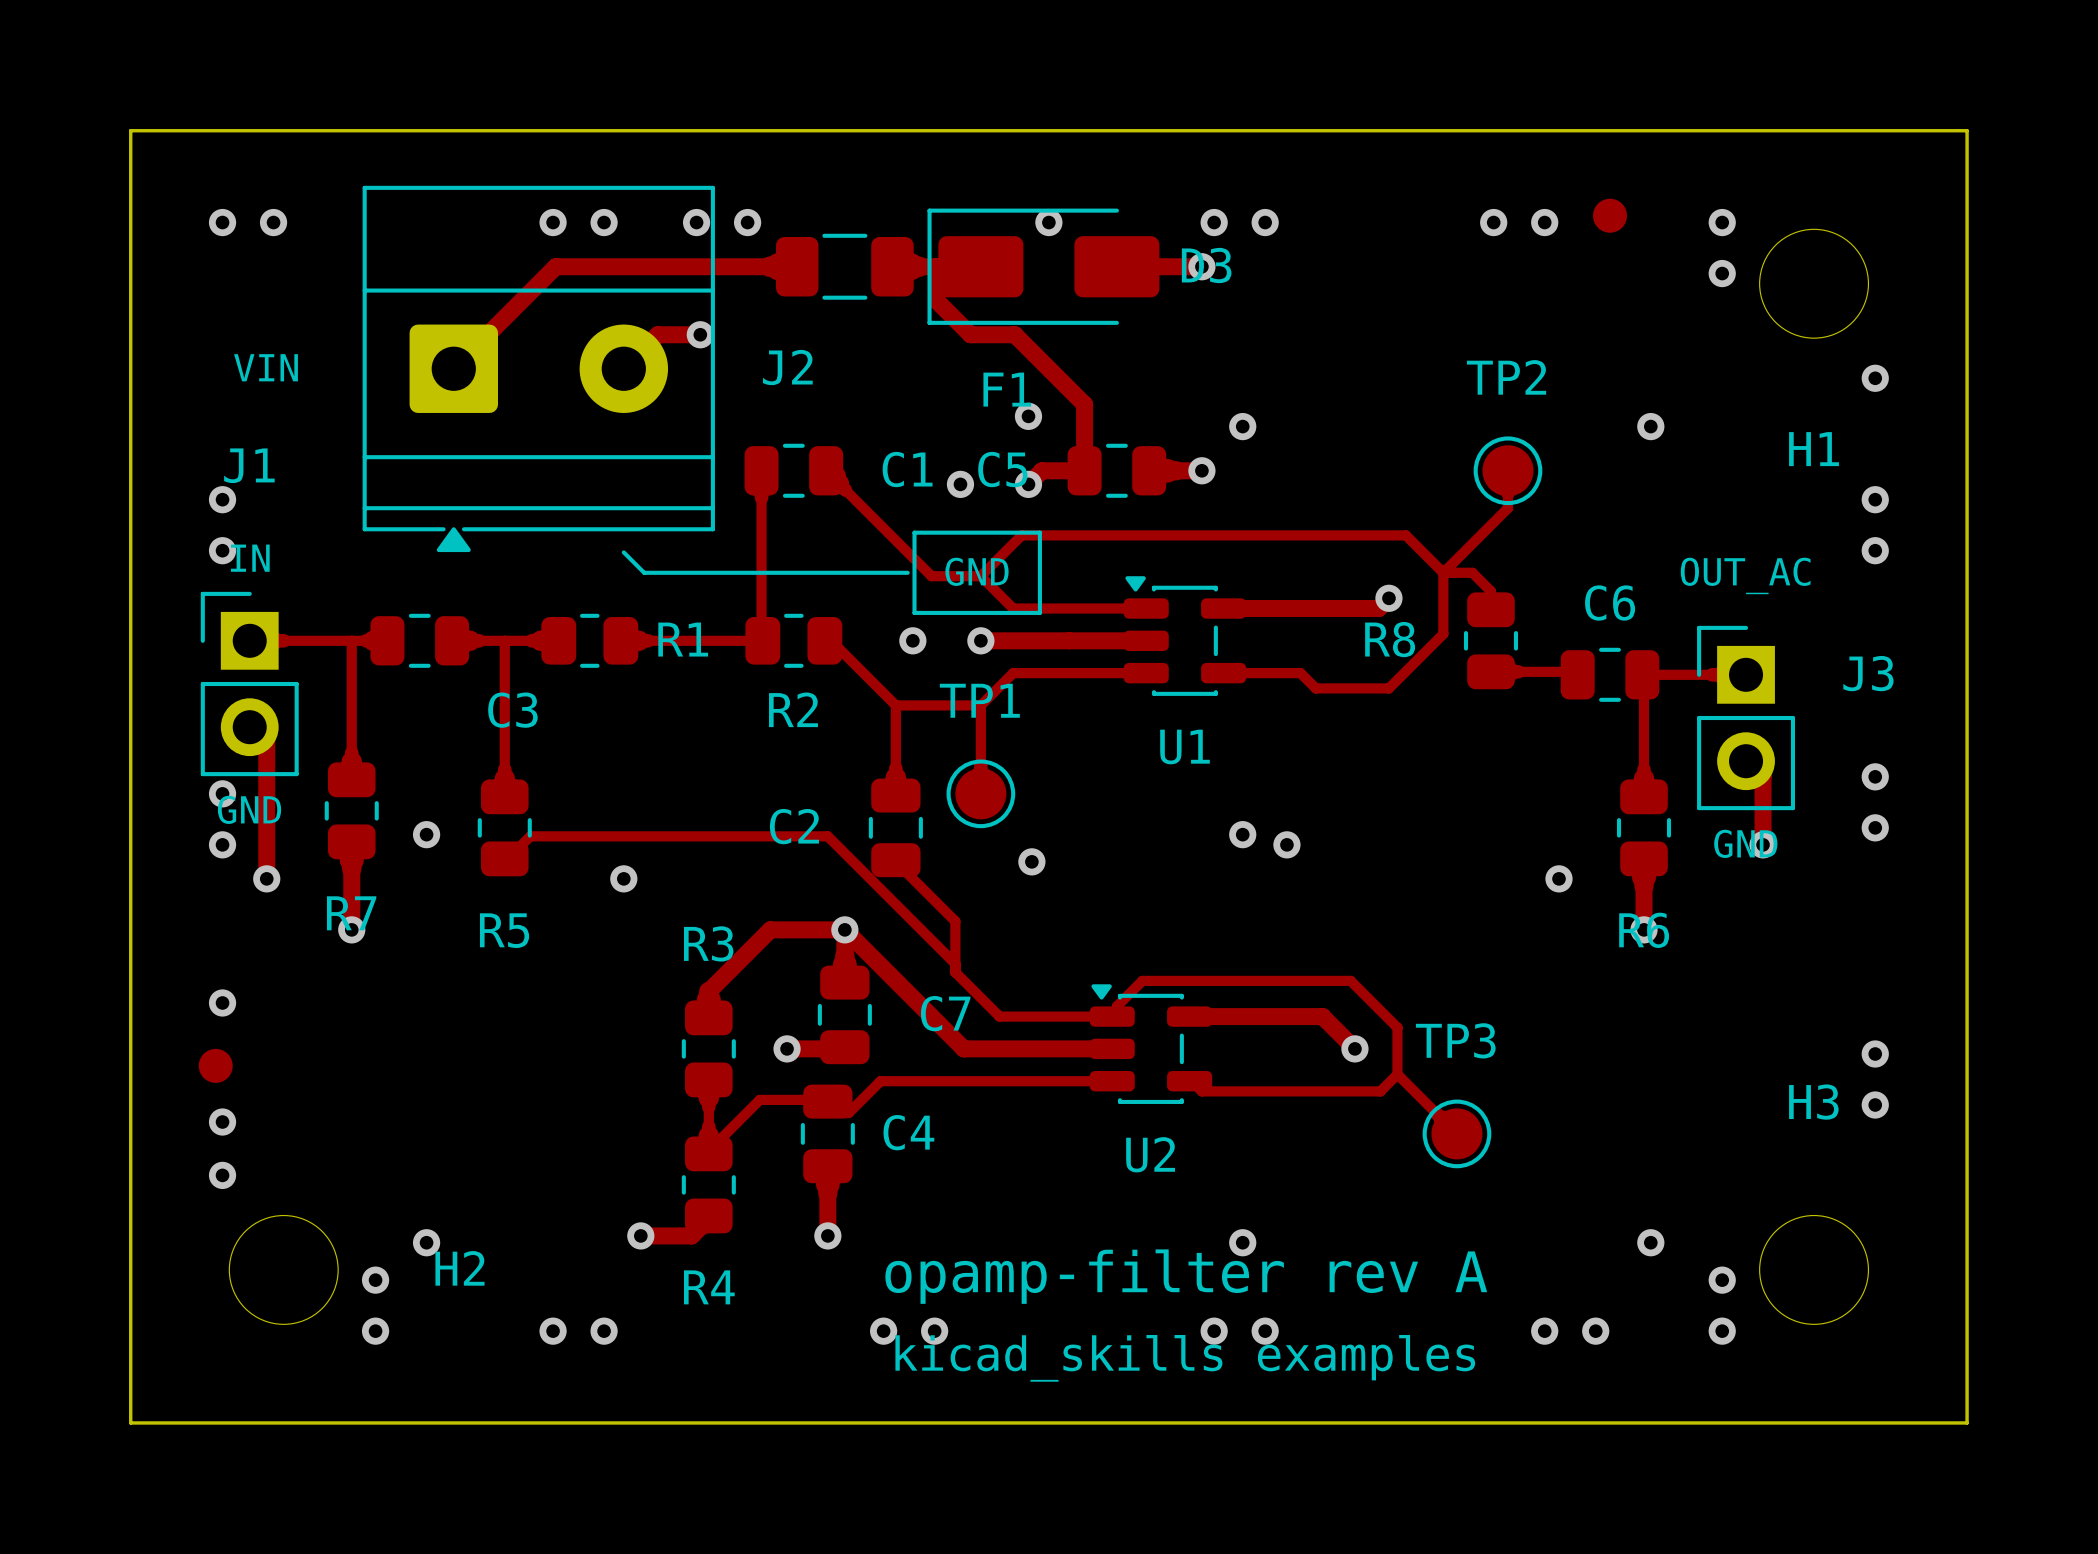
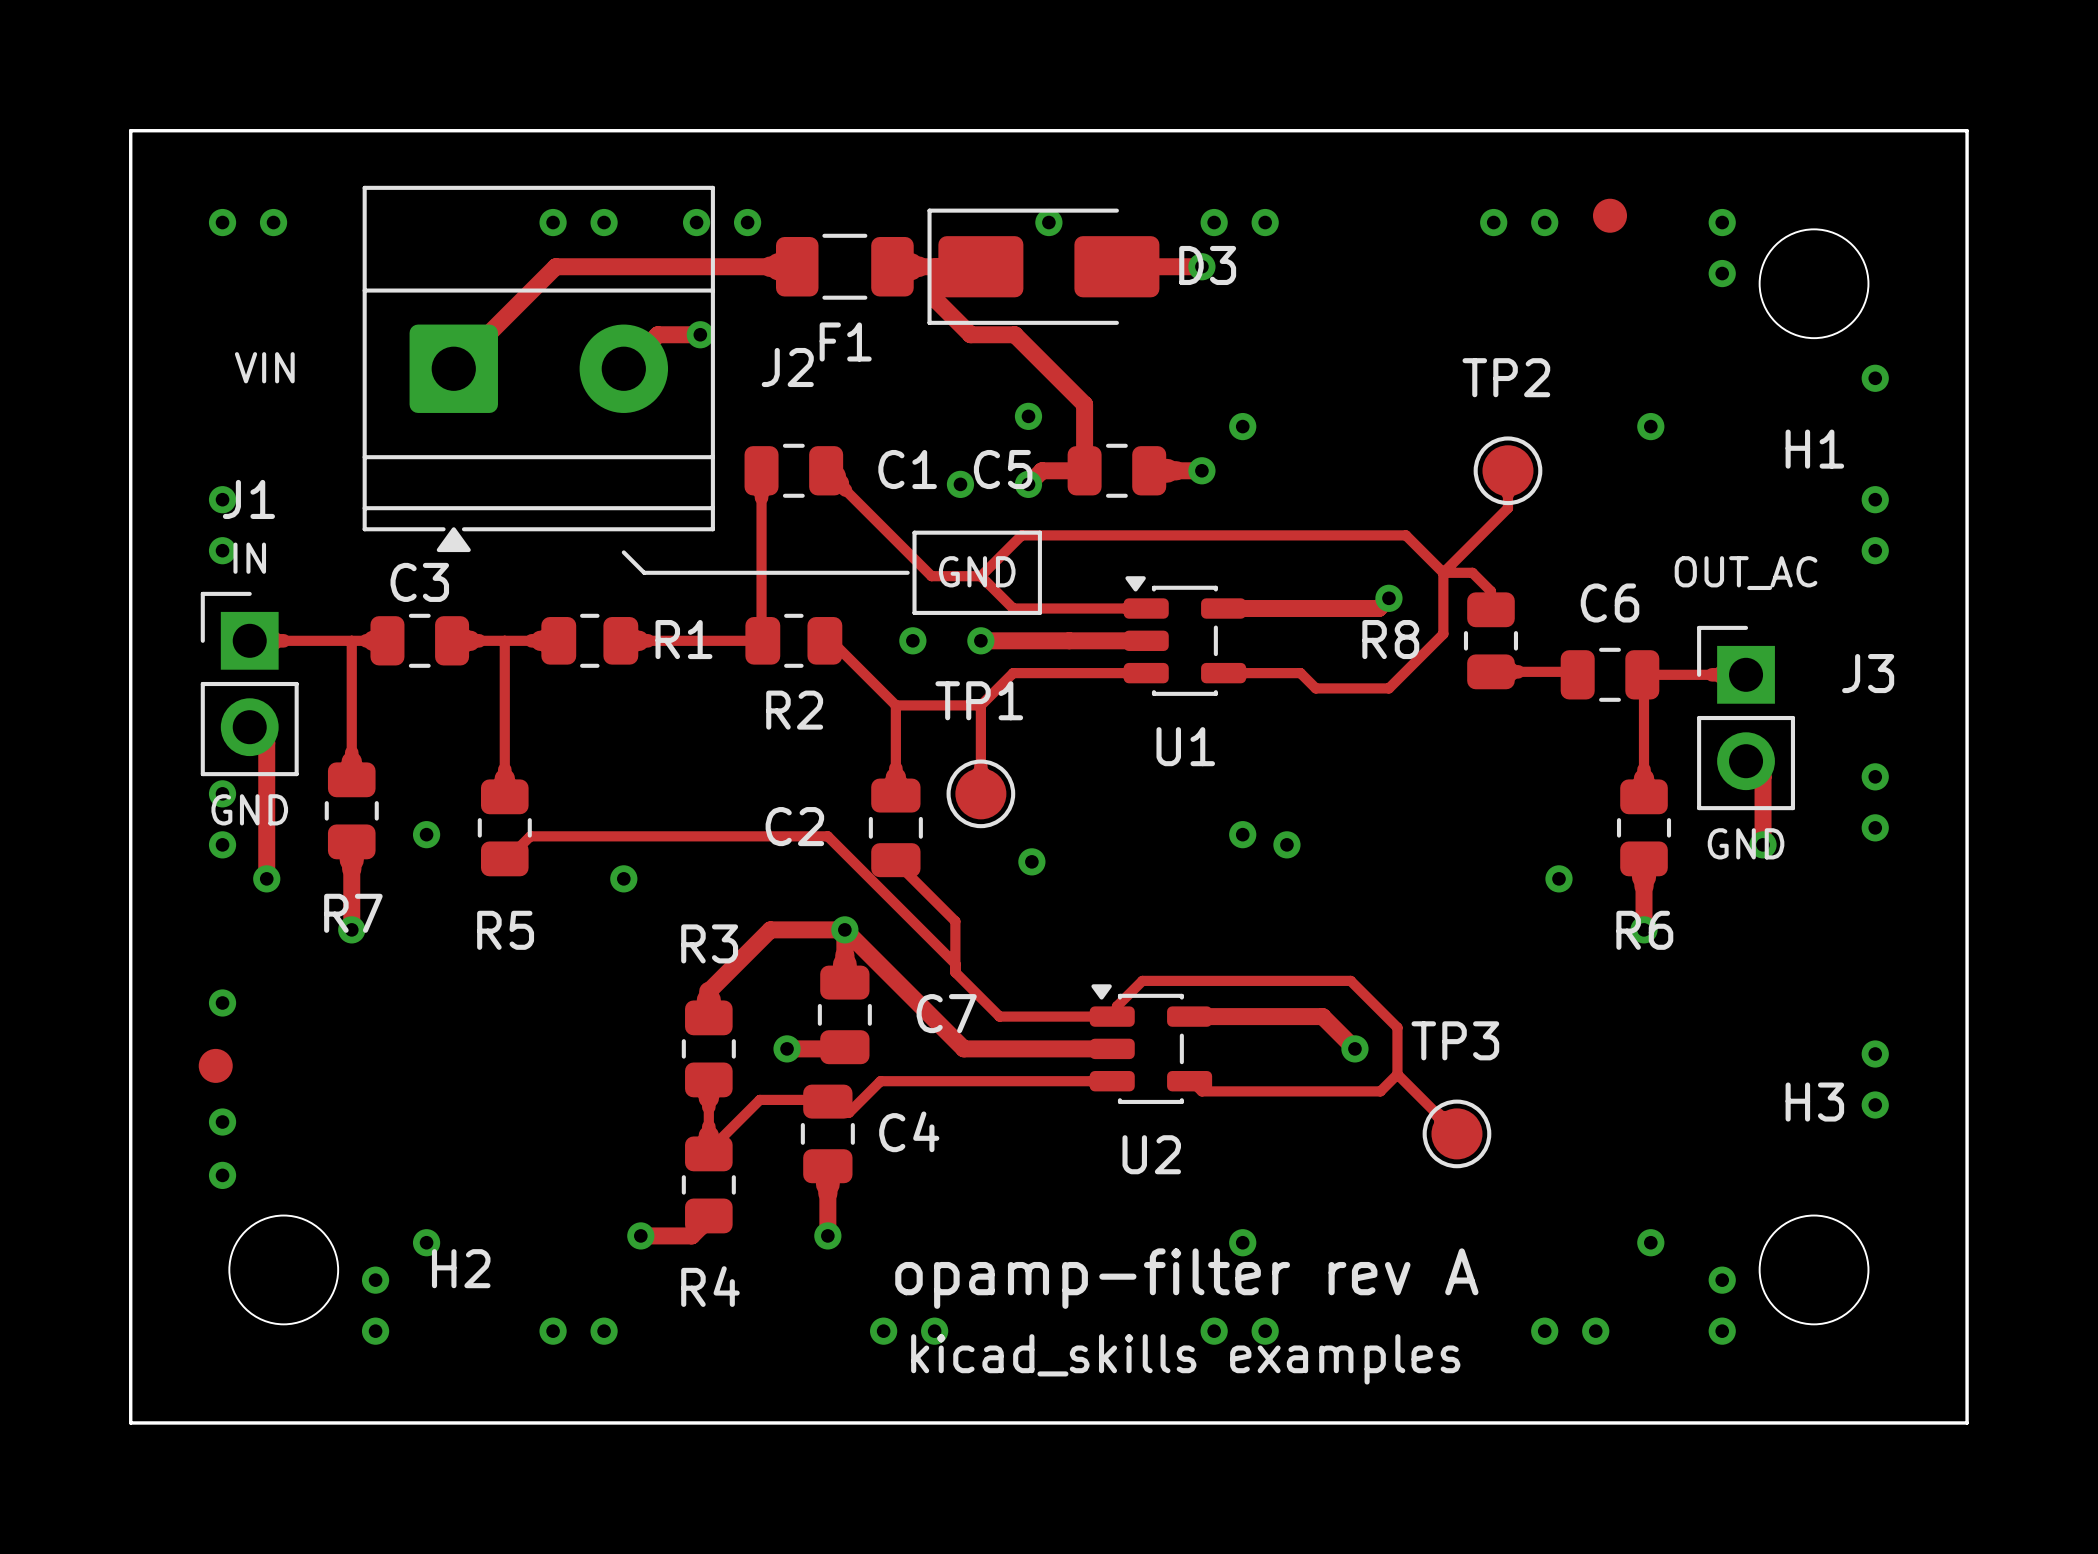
F1 name position: F1 (1007, 389) -> F1 (845, 341)
J1 name position: J1 (249, 465) -> J1 (248, 499)
C3 name position: C3 (512, 710) -> C3 (419, 582)

